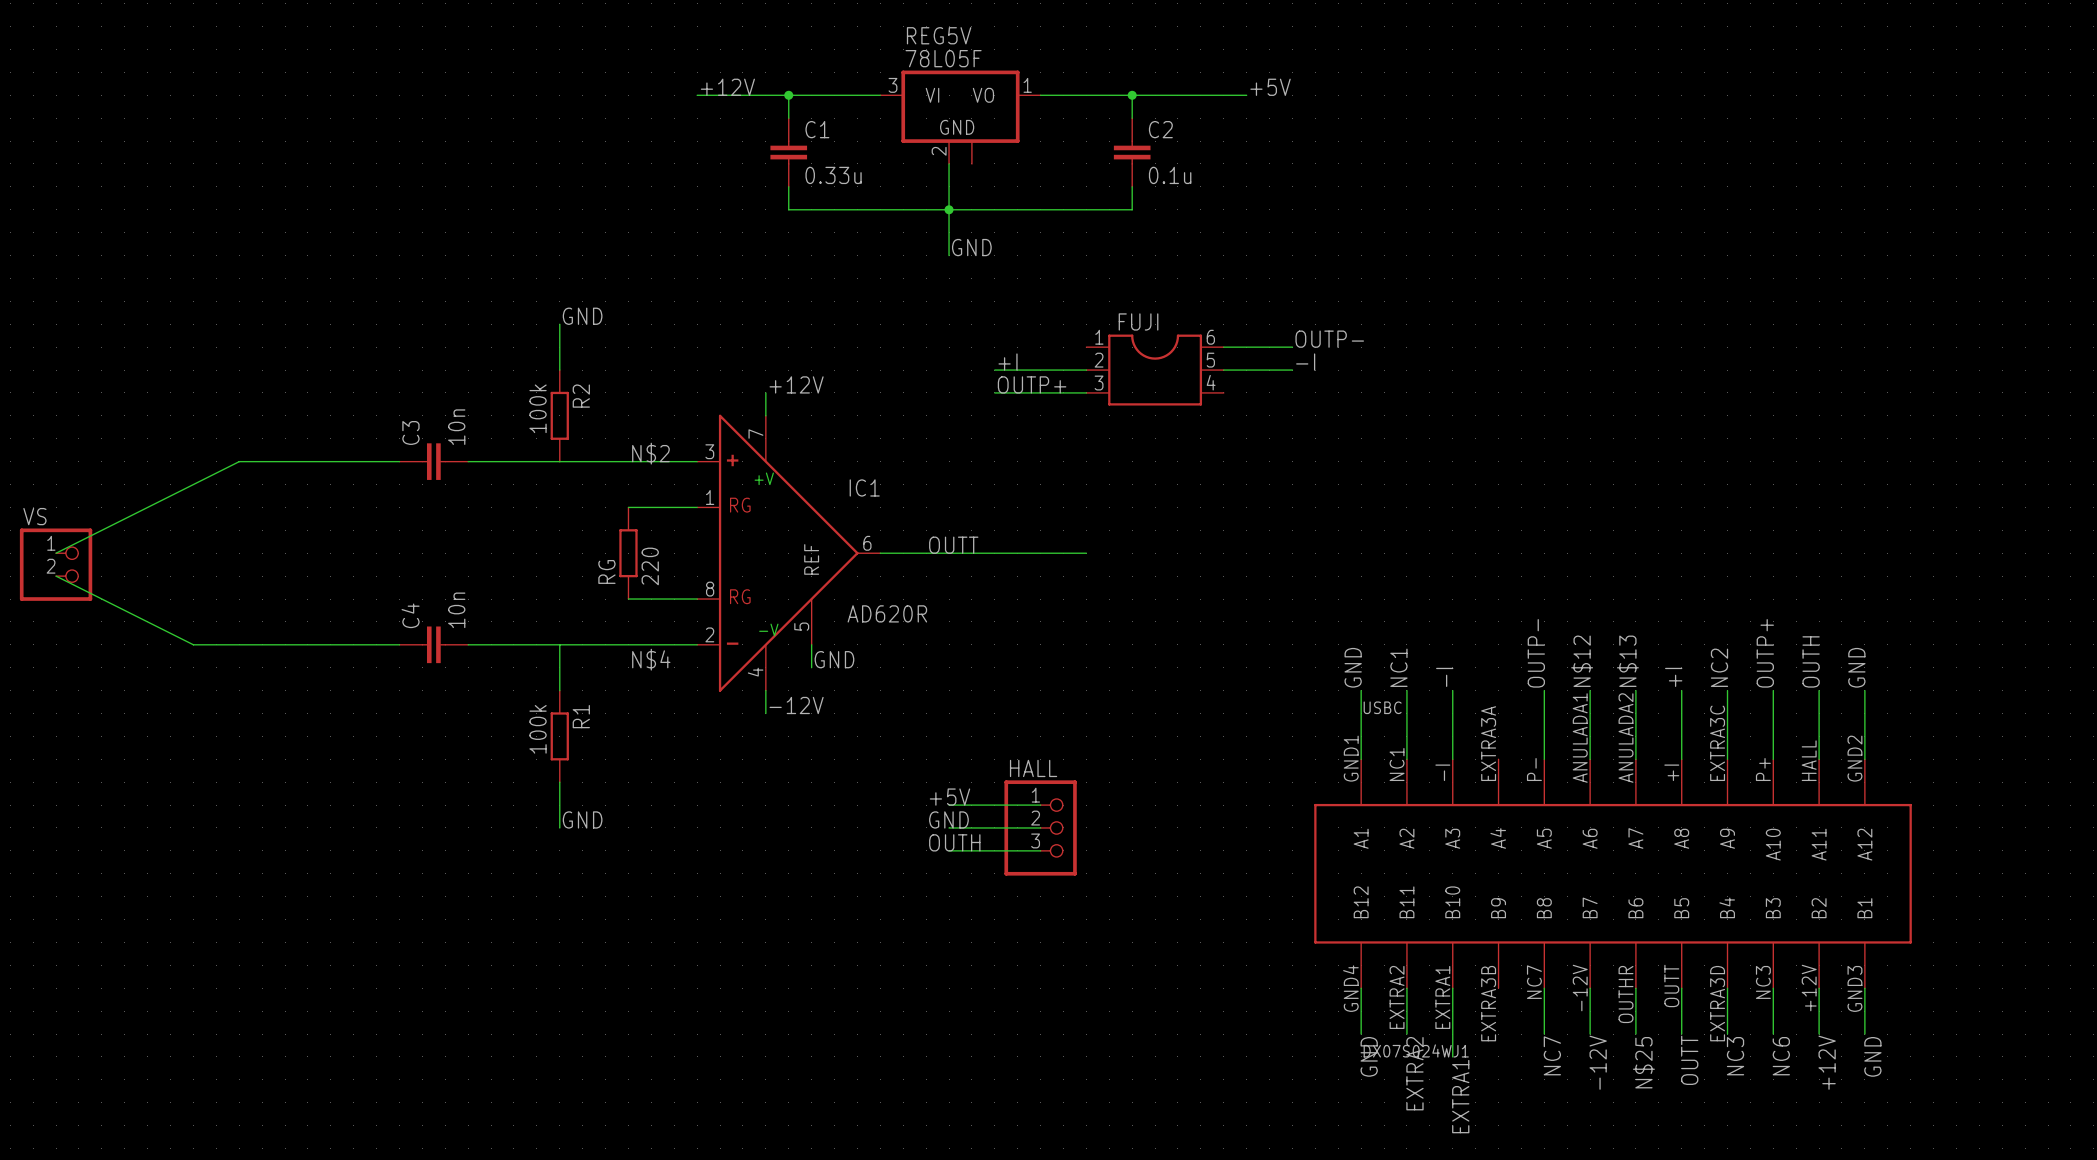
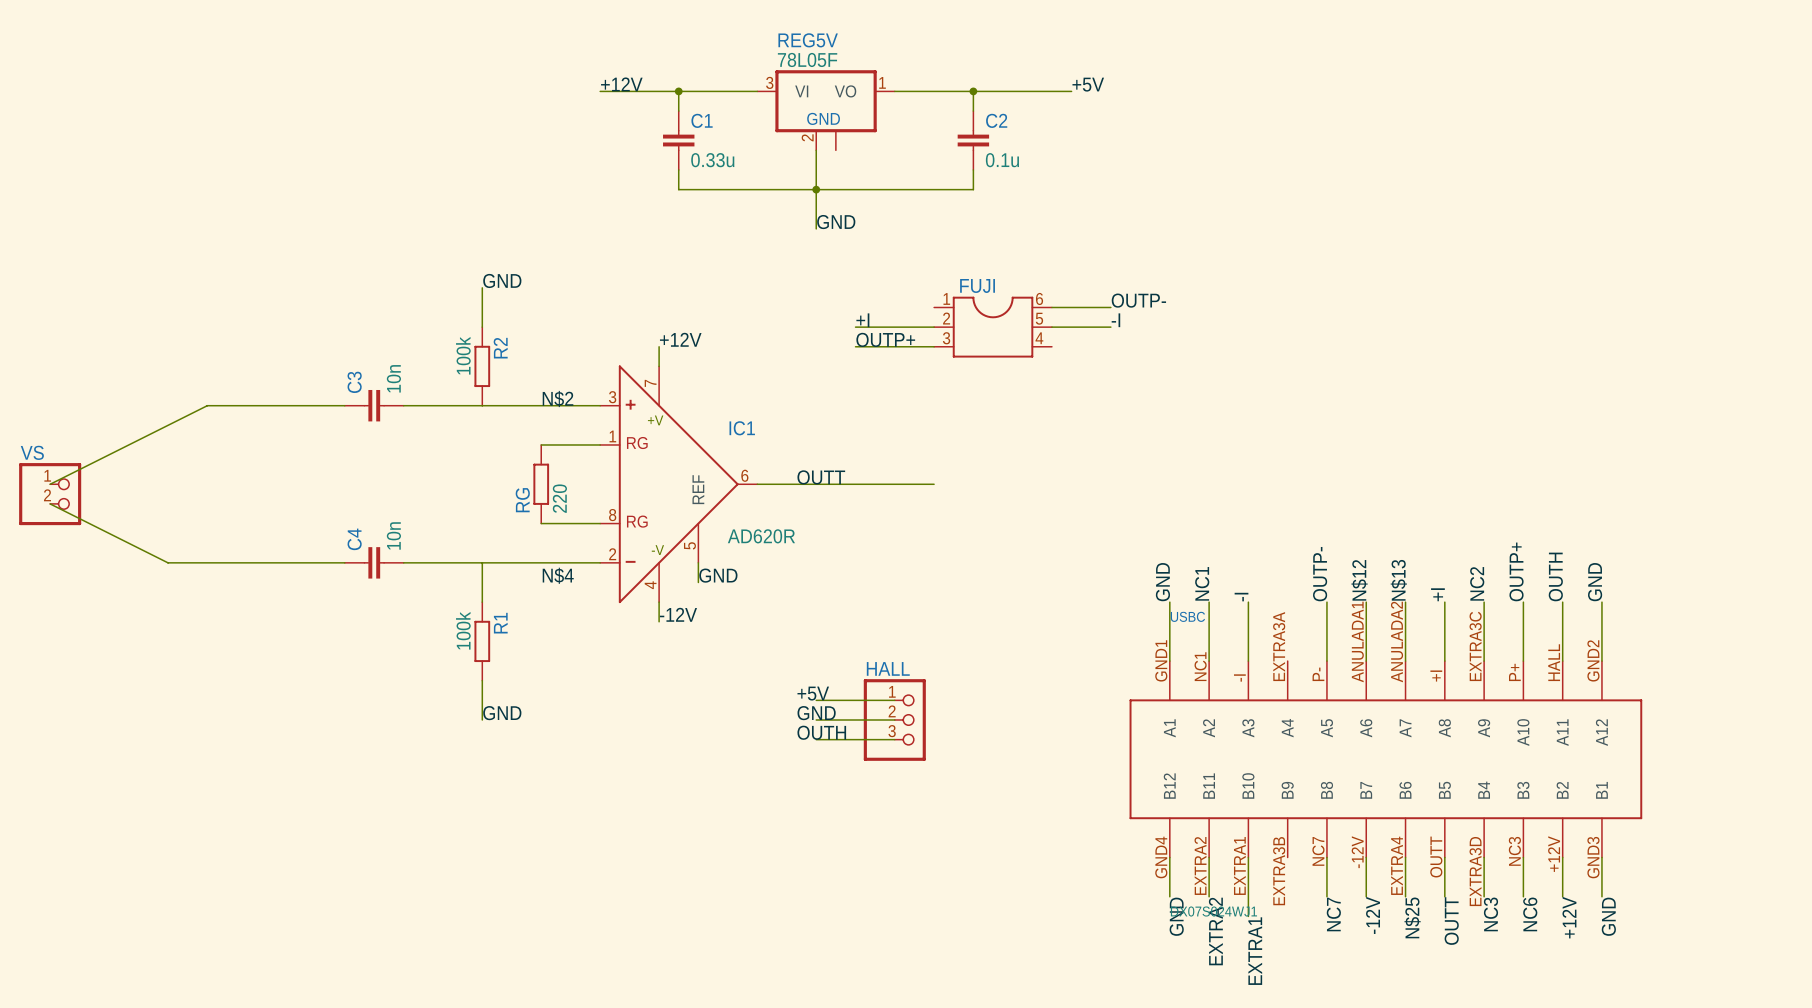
USBC pin number: OUTHR (1626, 994) -> EXTRA4 (1397, 865)

